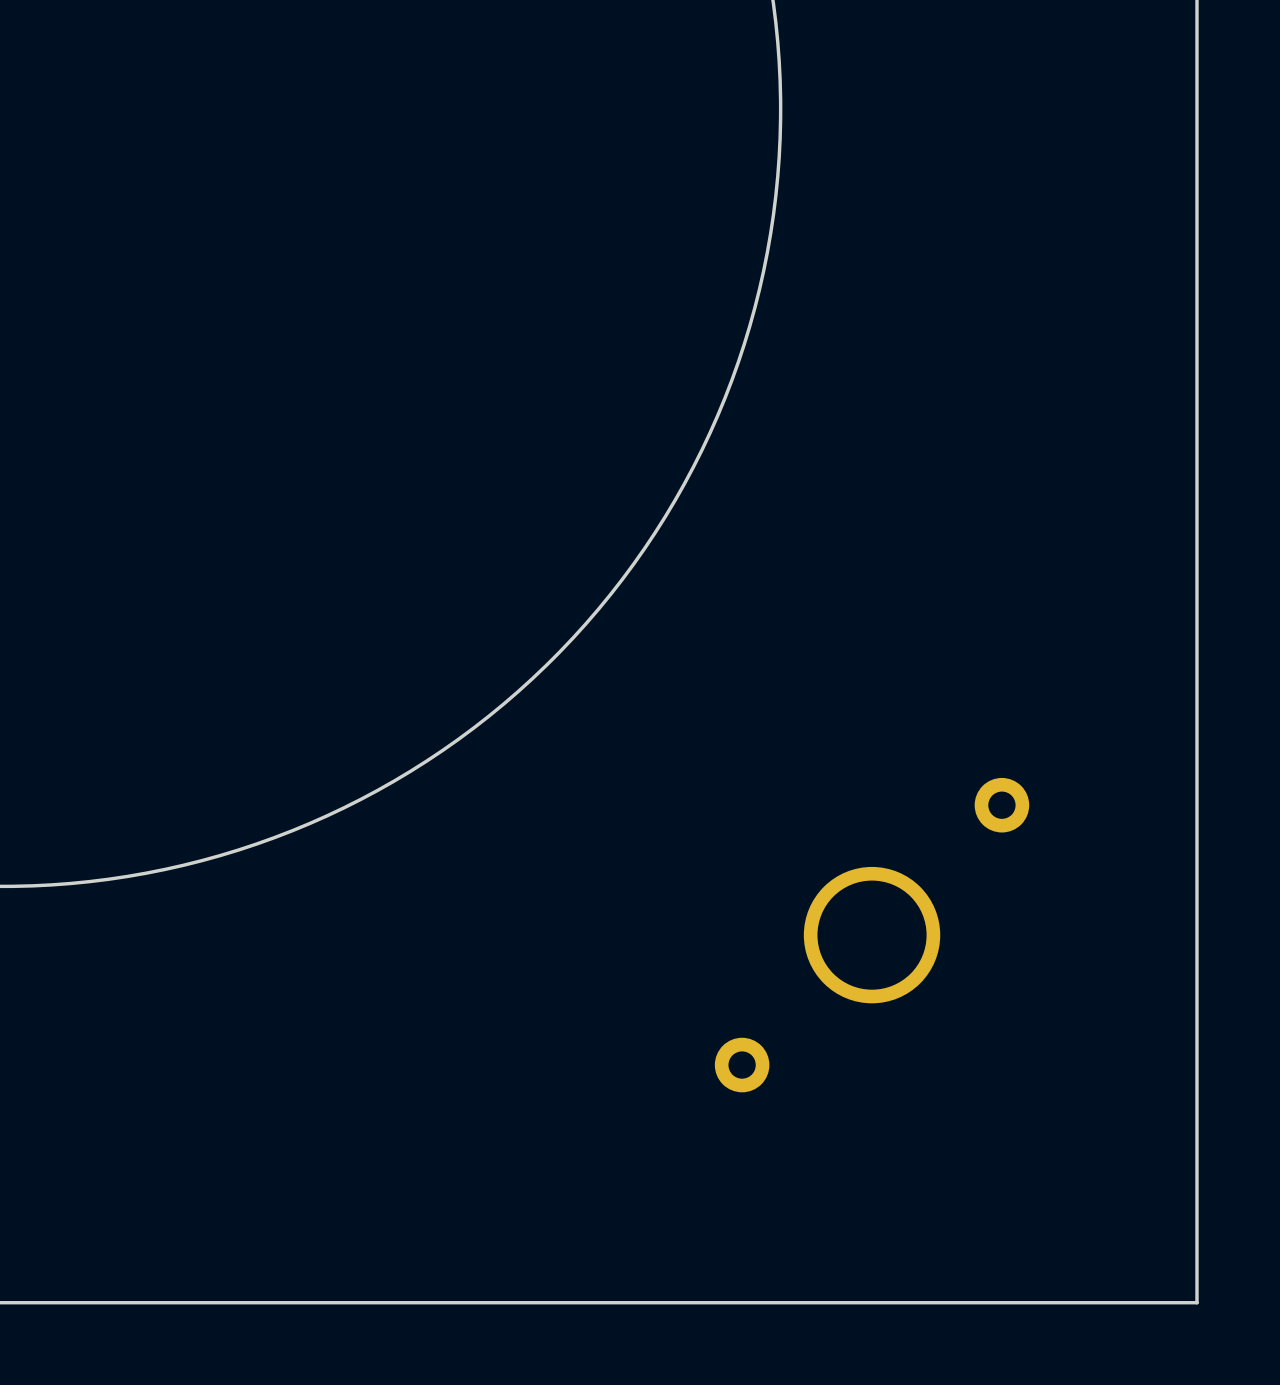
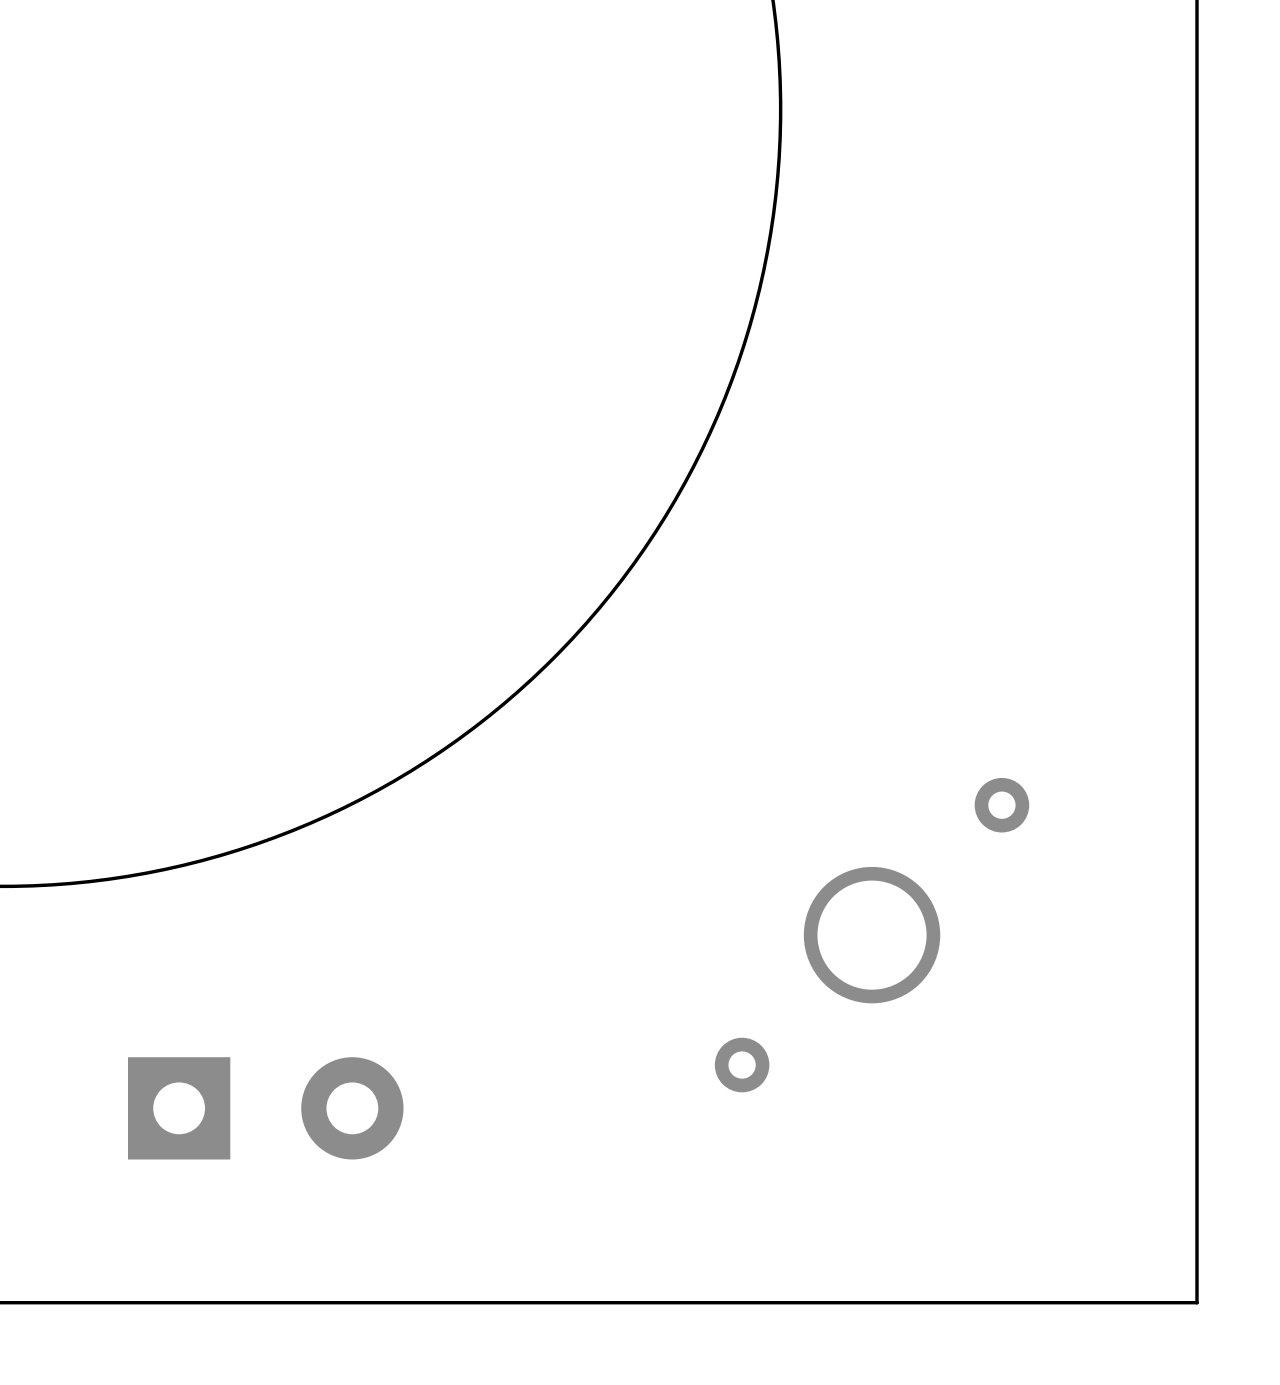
part: none -> (265, 1108)

